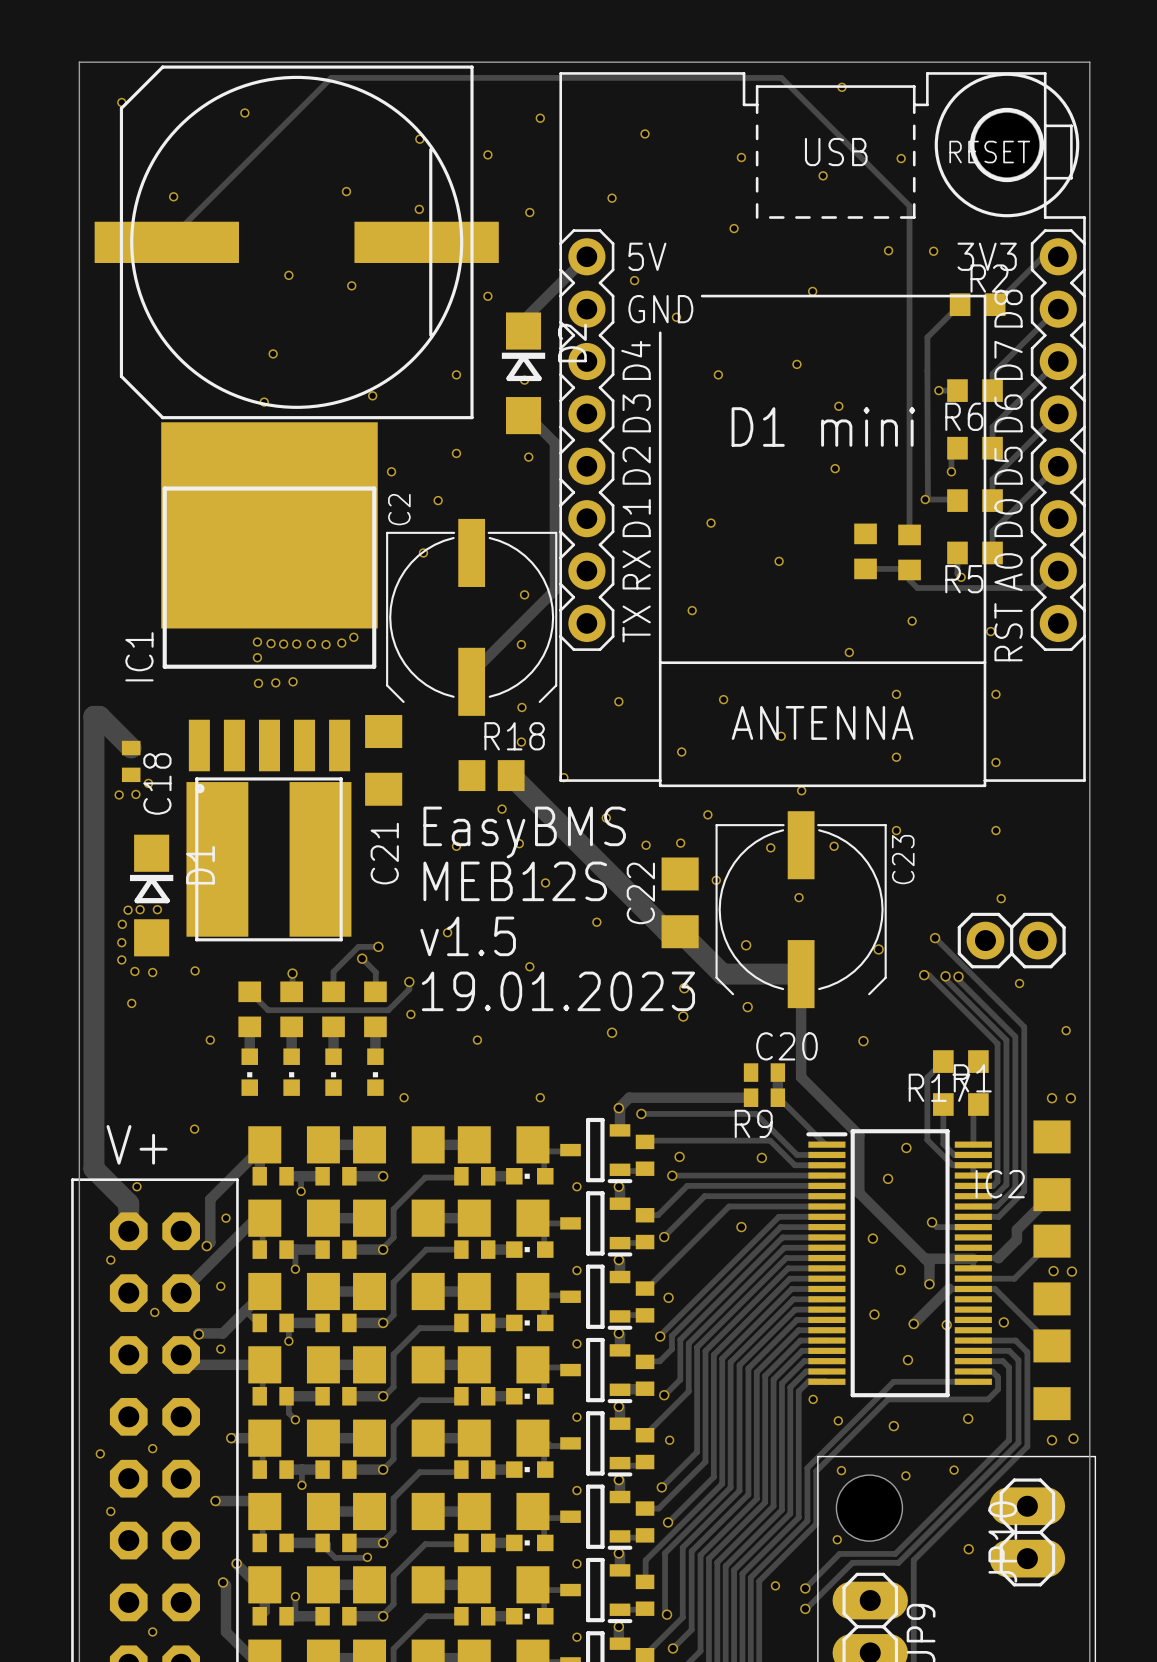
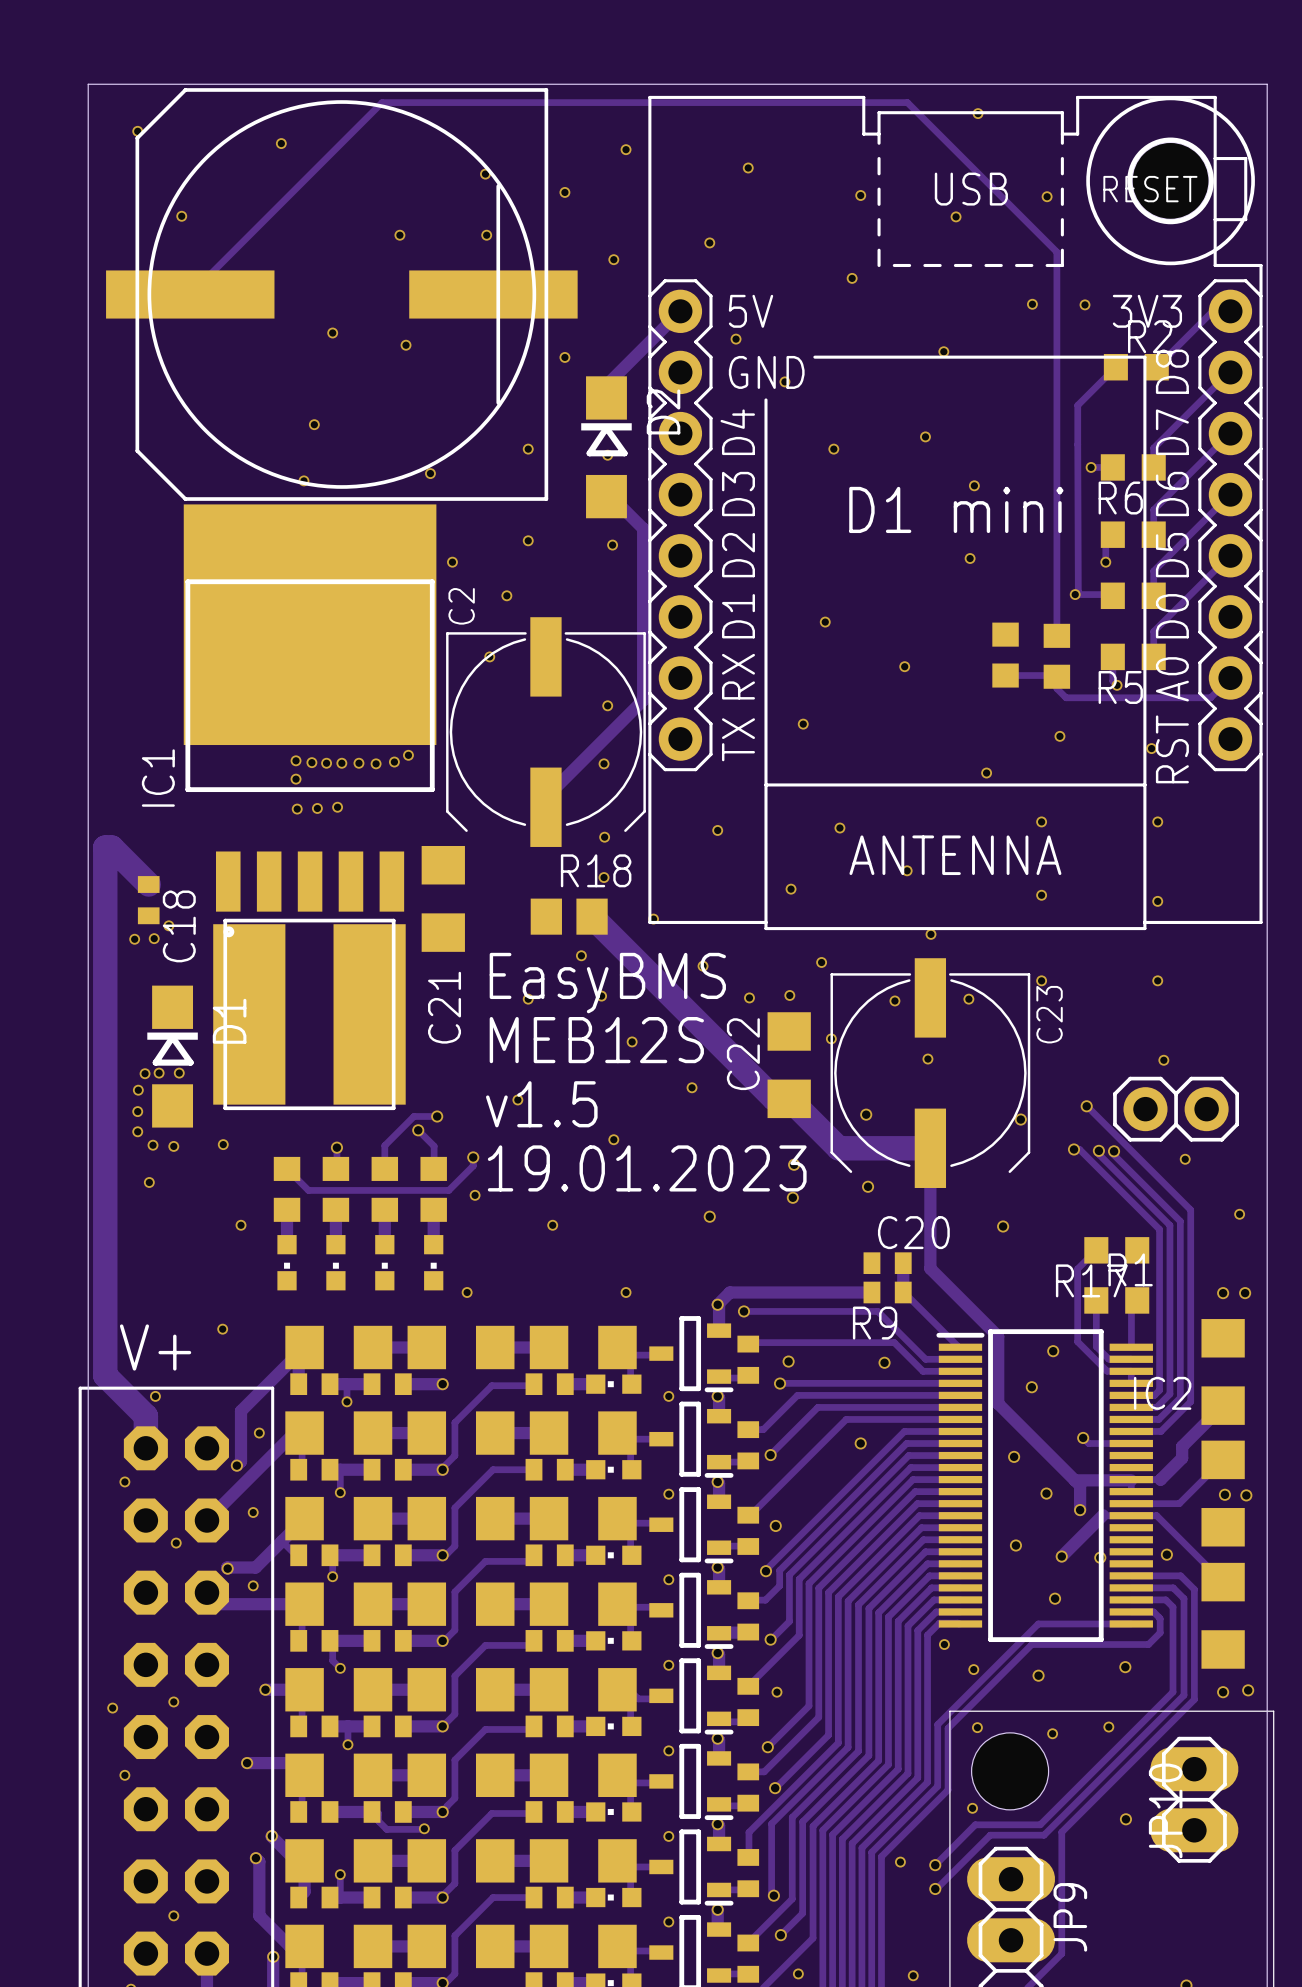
via position: (173, 196) -> (181, 216)
via position: (419, 209) -> (486, 235)

